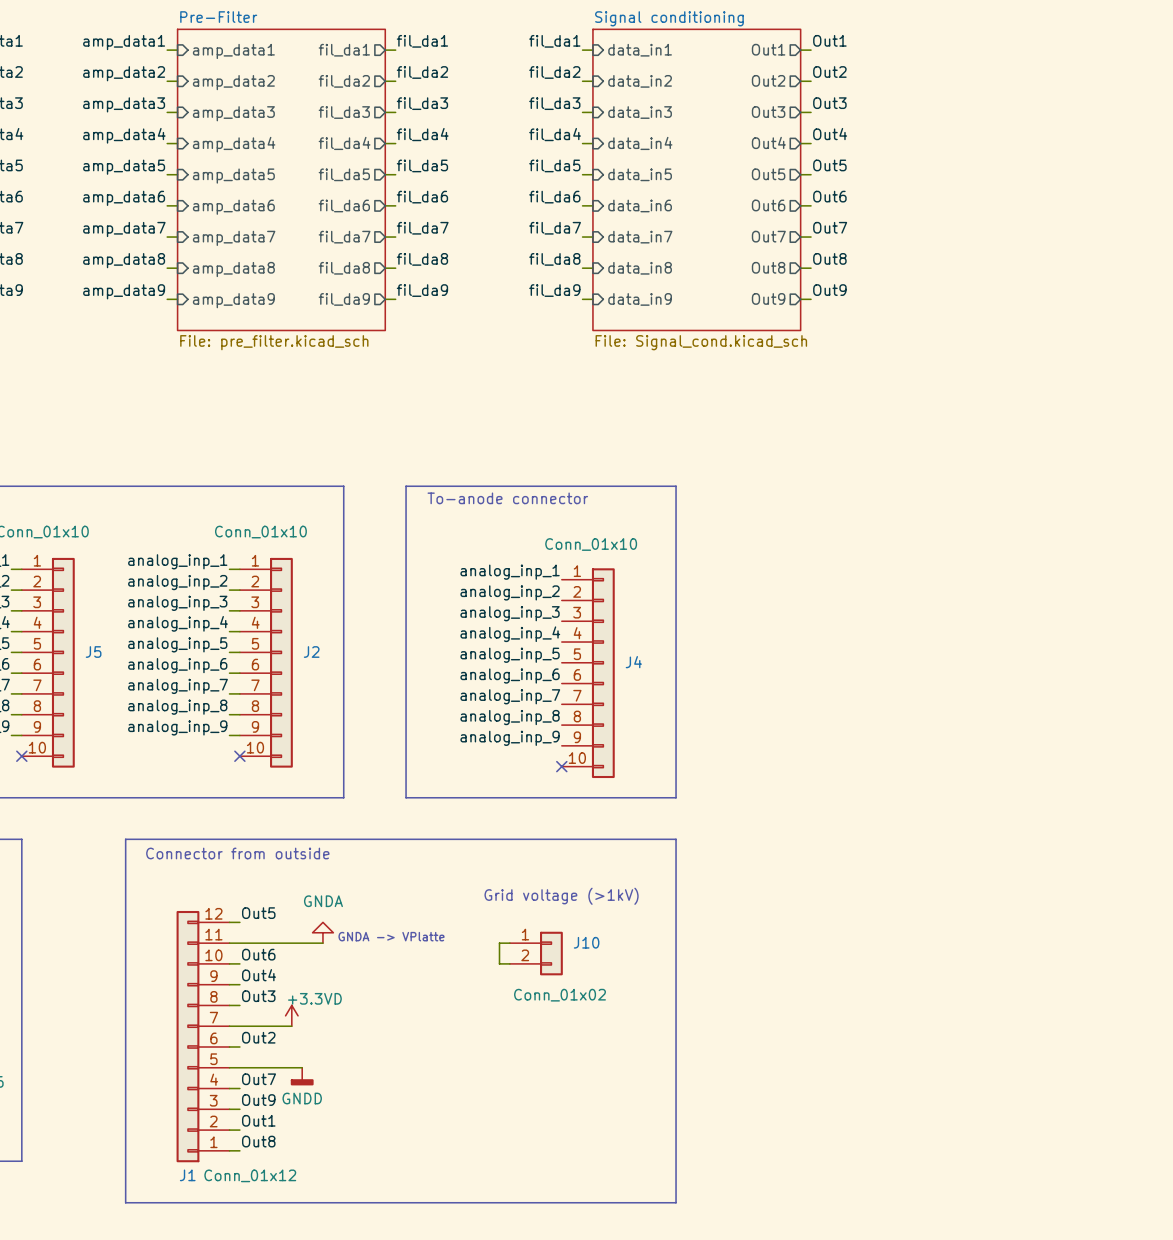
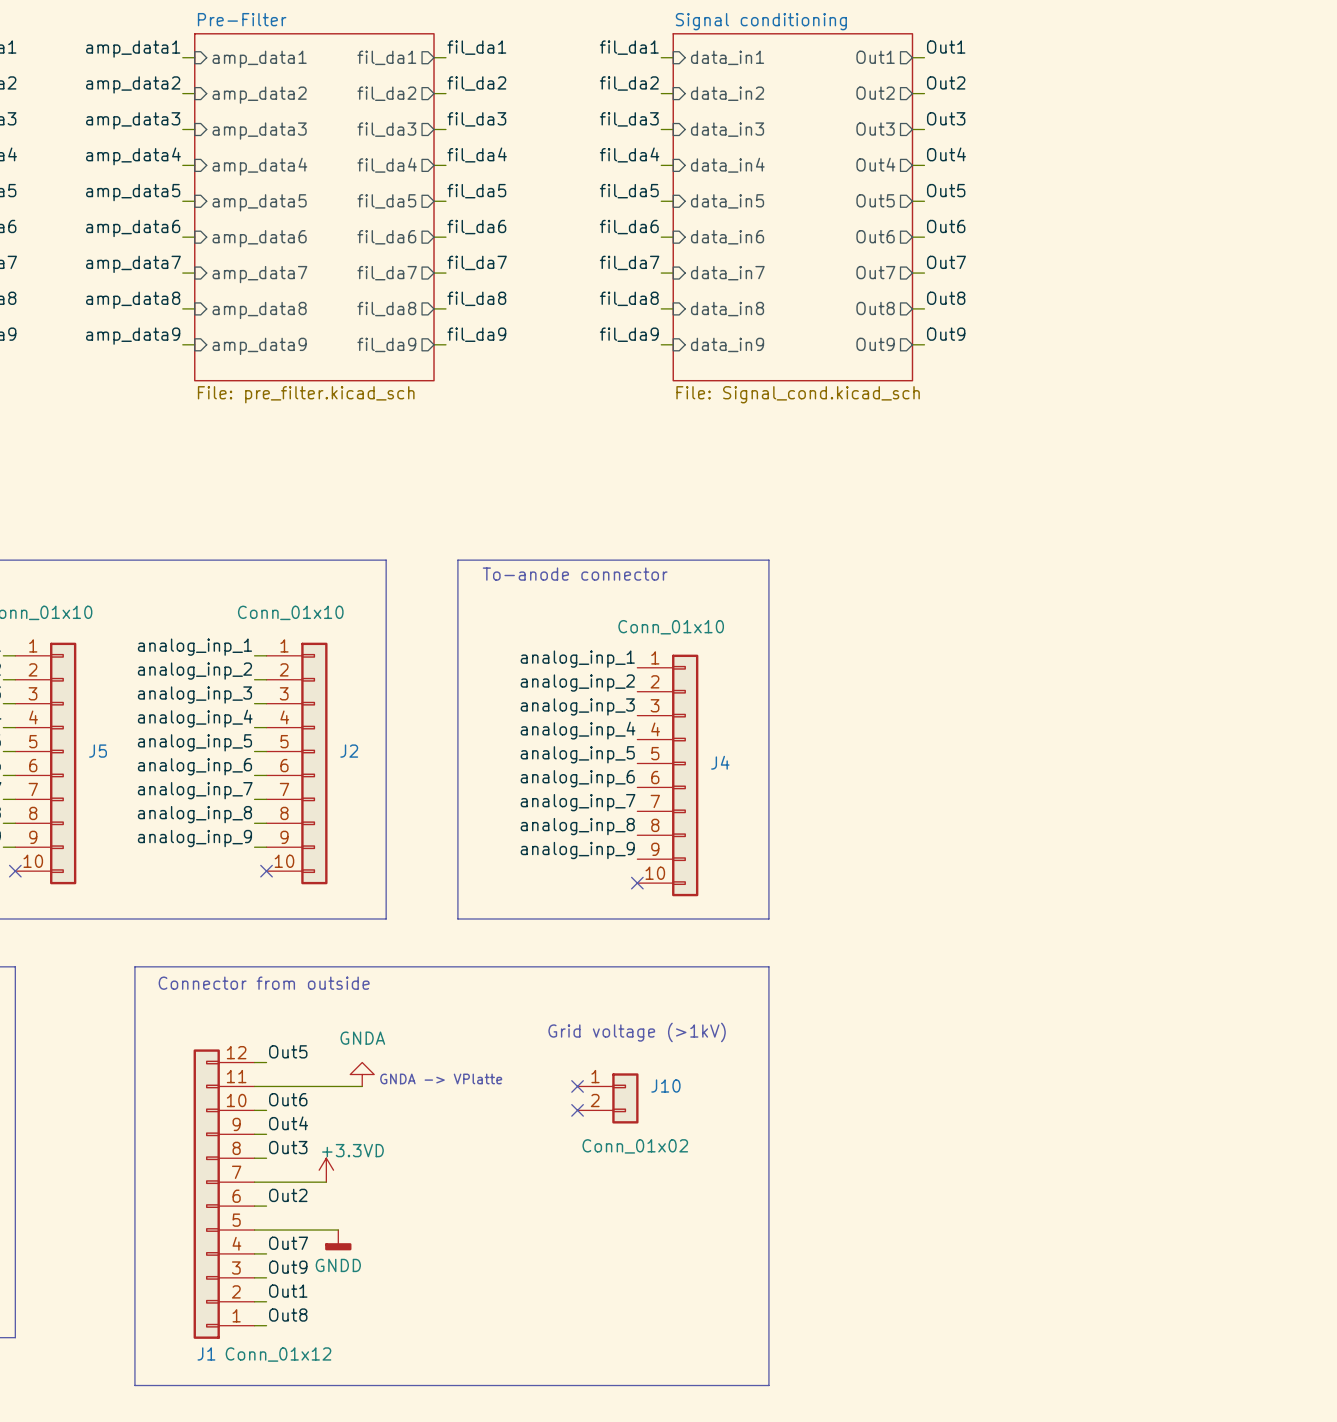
wire: (509, 943) (499, 943) (499, 963) (509, 963) -> none
no-connect mark: none -> (577, 1086)
no-connect mark: none -> (577, 1110)

